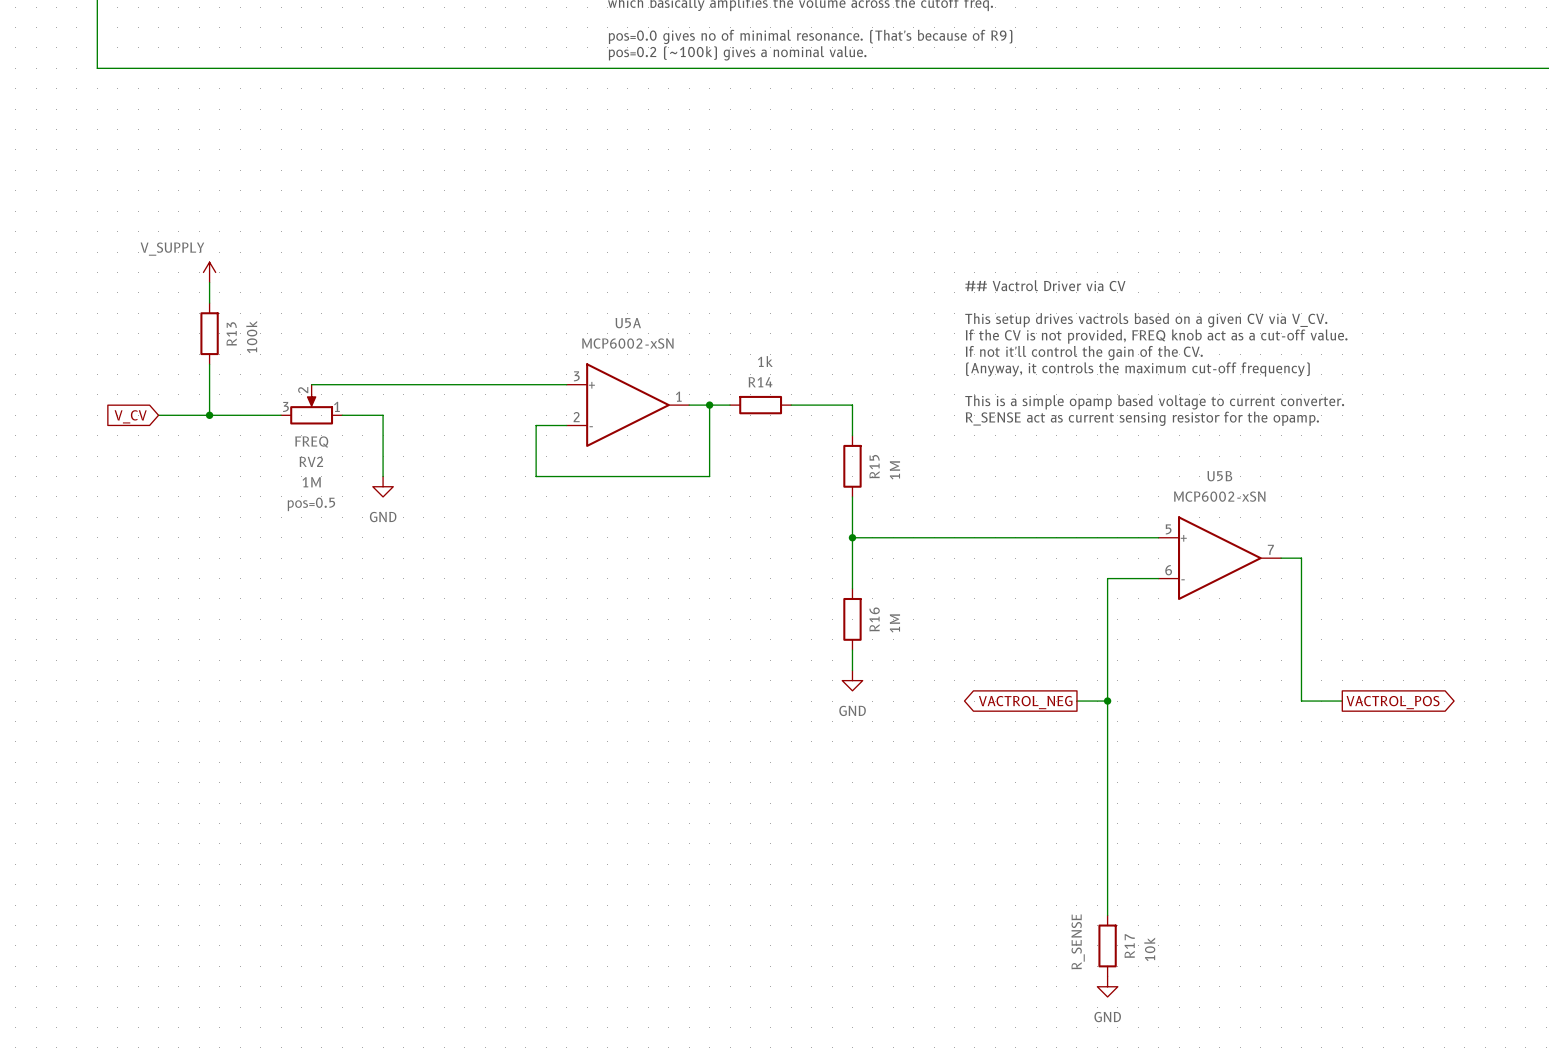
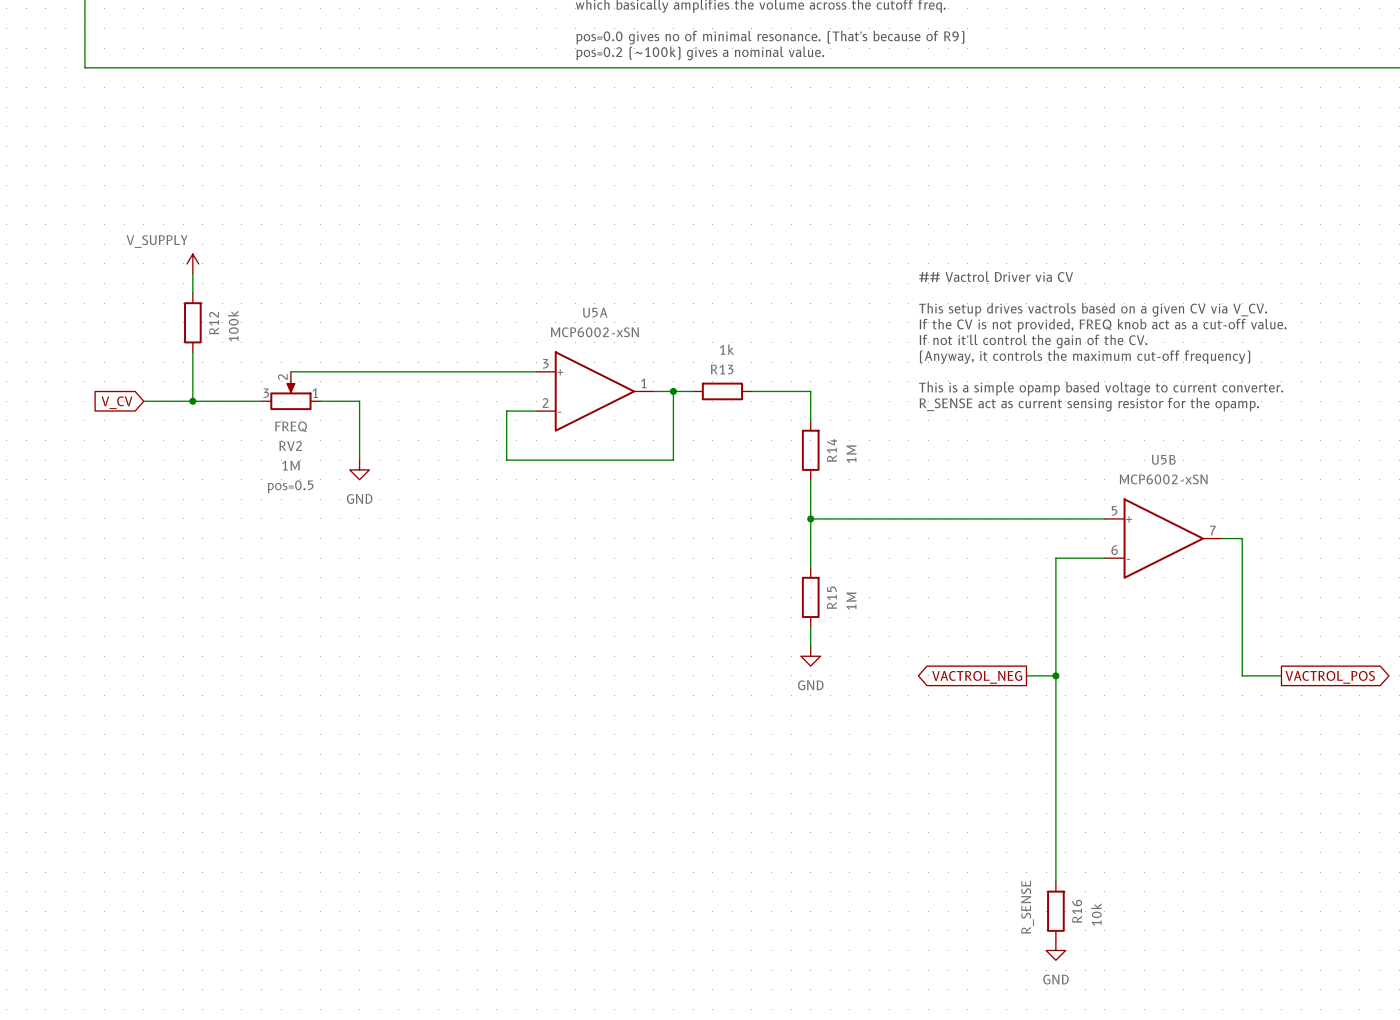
R13 name: R13 (231, 333) -> R12 (214, 323)
R14 name: R14 (760, 382) -> R13 (722, 369)
R15 name: R15 (874, 466) -> R14 (831, 450)
R16 name: R16 (874, 619) -> R15 (831, 597)
R17 name: R17 (1129, 946) -> R16 (1077, 911)

